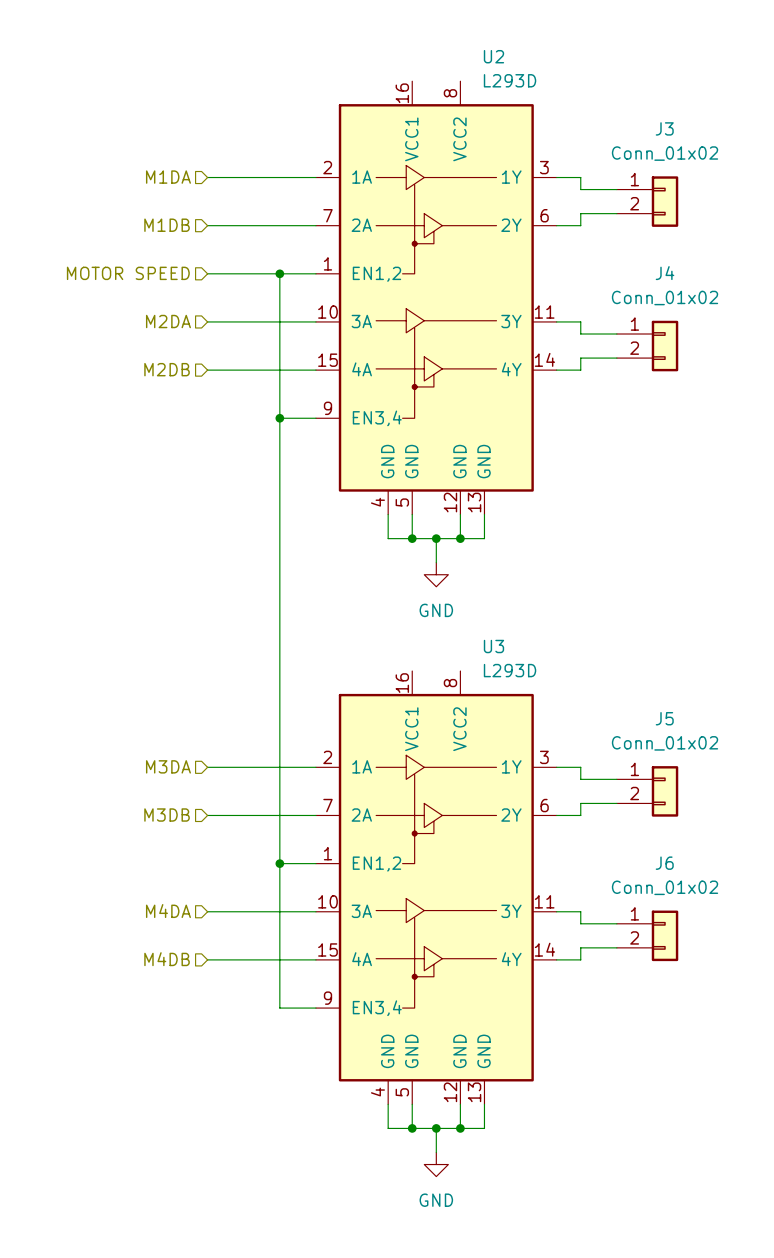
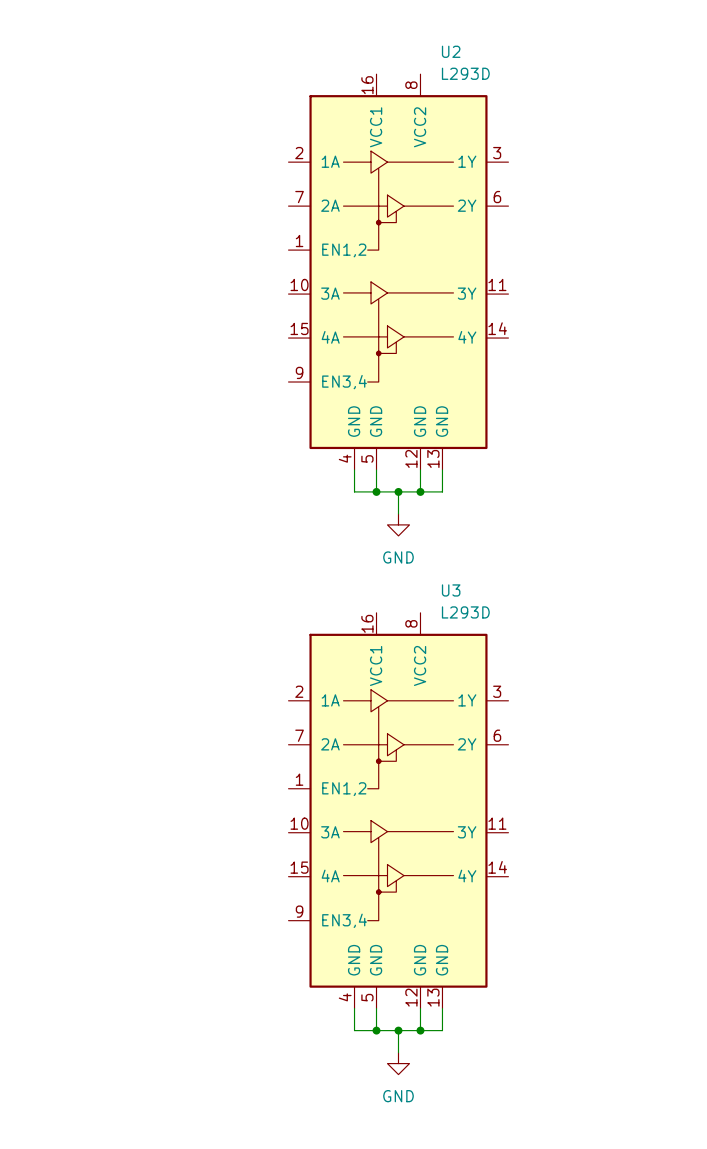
hierarchical label: M1DA (168, 177) -> none
wire: (207, 177) (315, 177) -> none
wire: (556, 177) (580, 177) (580, 189) (616, 189) -> none
J3: Conn_01x02 (647, 201) -> none
wire: (616, 213) (580, 213) (580, 225) (556, 225) -> none
hierarchical label: M1DB (167, 225) -> none
wire: (207, 225) (315, 225) -> none
hierarchical label: MOTOR SPEED (128, 273) -> none
wire: (207, 273) (315, 273) -> none
wire: (279, 273) (279, 1008) (315, 1008) -> none
junction: (279, 273) -> none
hierarchical label: M2DA (168, 321) -> none
wire: (207, 321) (315, 321) -> none
wire: (556, 321) (580, 321) (580, 334) (616, 334) -> none
J4: Conn_01x02 (647, 346) -> none
wire: (616, 358) (580, 358) (580, 370) (556, 370) -> none
hierarchical label: M2DB (167, 369) -> none
wire: (207, 370) (315, 370) -> none
wire: (279, 418) (315, 418) -> none
junction: (279, 418) -> none
hierarchical label: M3DA (168, 766) -> none
wire: (207, 767) (315, 767) -> none
wire: (556, 767) (580, 767) (580, 779) (616, 779) -> none
J5: Conn_01x02 (647, 791) -> none
wire: (616, 803) (580, 803) (580, 815) (556, 815) -> none
hierarchical label: M3DB (167, 815) -> none
wire: (207, 815) (315, 815) -> none
wire: (279, 863) (315, 863) -> none
junction: (279, 863) -> none
hierarchical label: M4DA (168, 911) -> none
wire: (207, 911) (315, 911) -> none
wire: (556, 911) (580, 911) (580, 923) (616, 923) -> none
J6: Conn_01x02 (647, 935) -> none
wire: (616, 947) (580, 947) (580, 959) (556, 959) -> none
hierarchical label: M4DB (167, 959) -> none
wire: (207, 959) (315, 959) -> none

